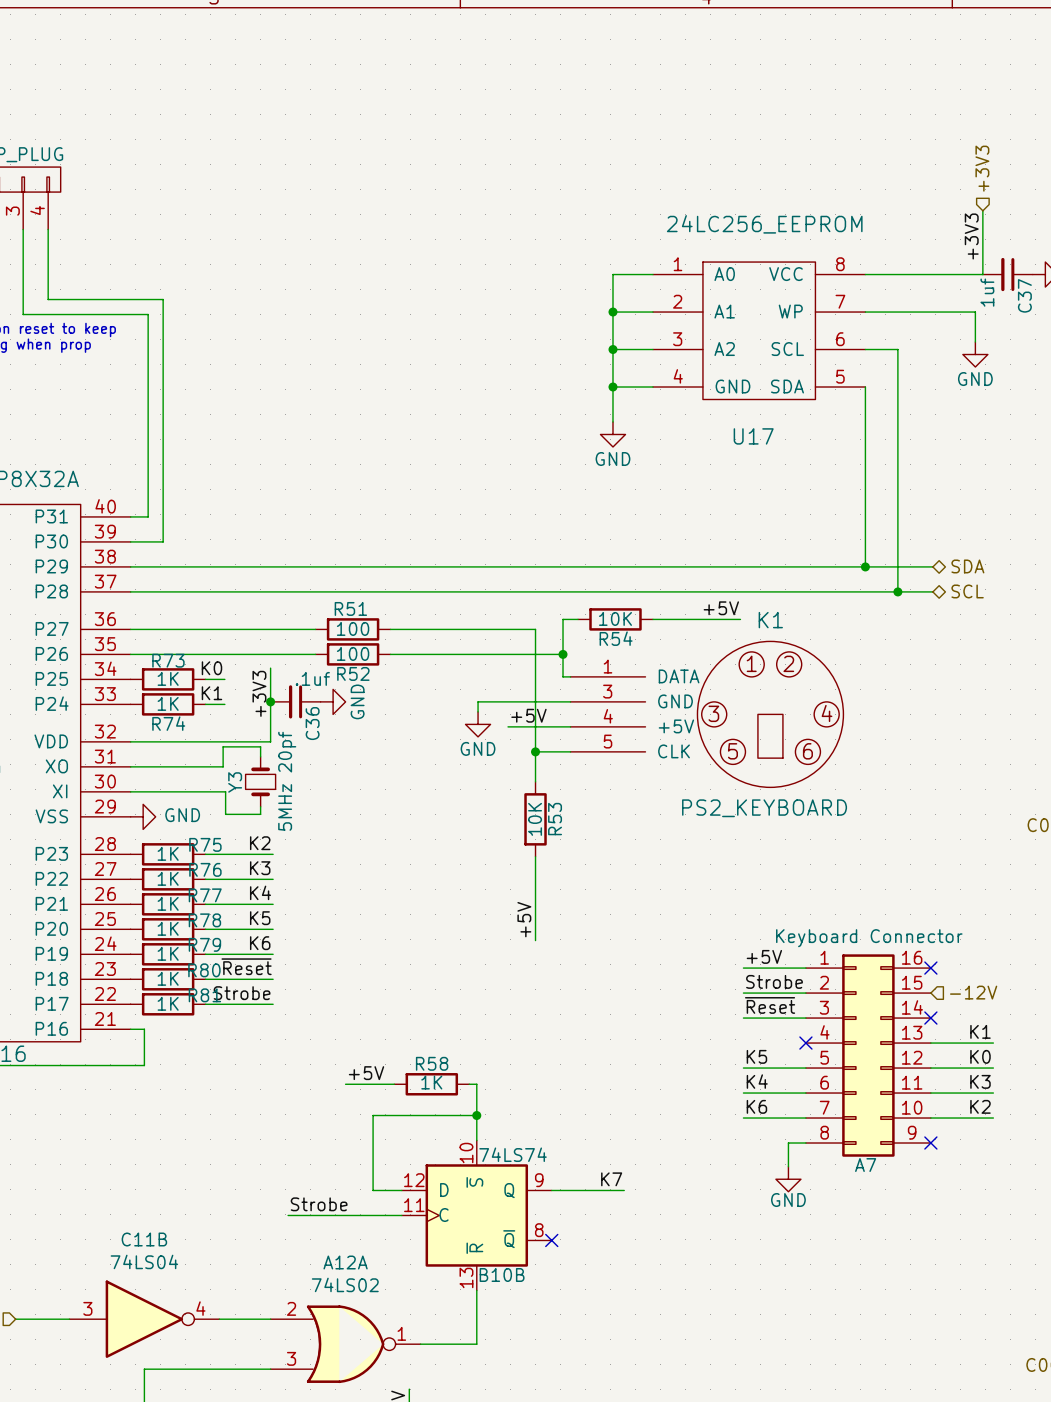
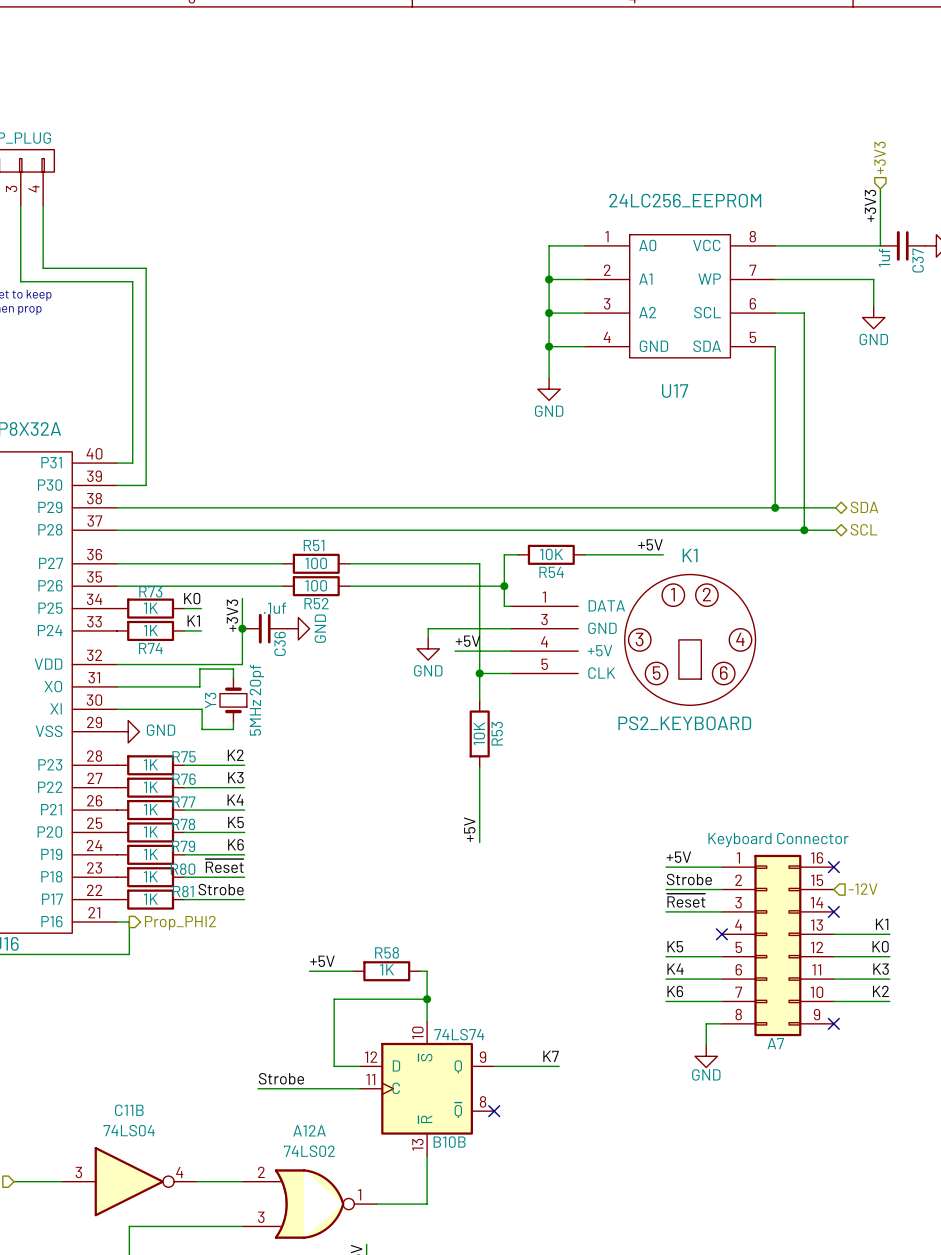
hierarchical label: none -> Prop_PHI2 (180, 923)

